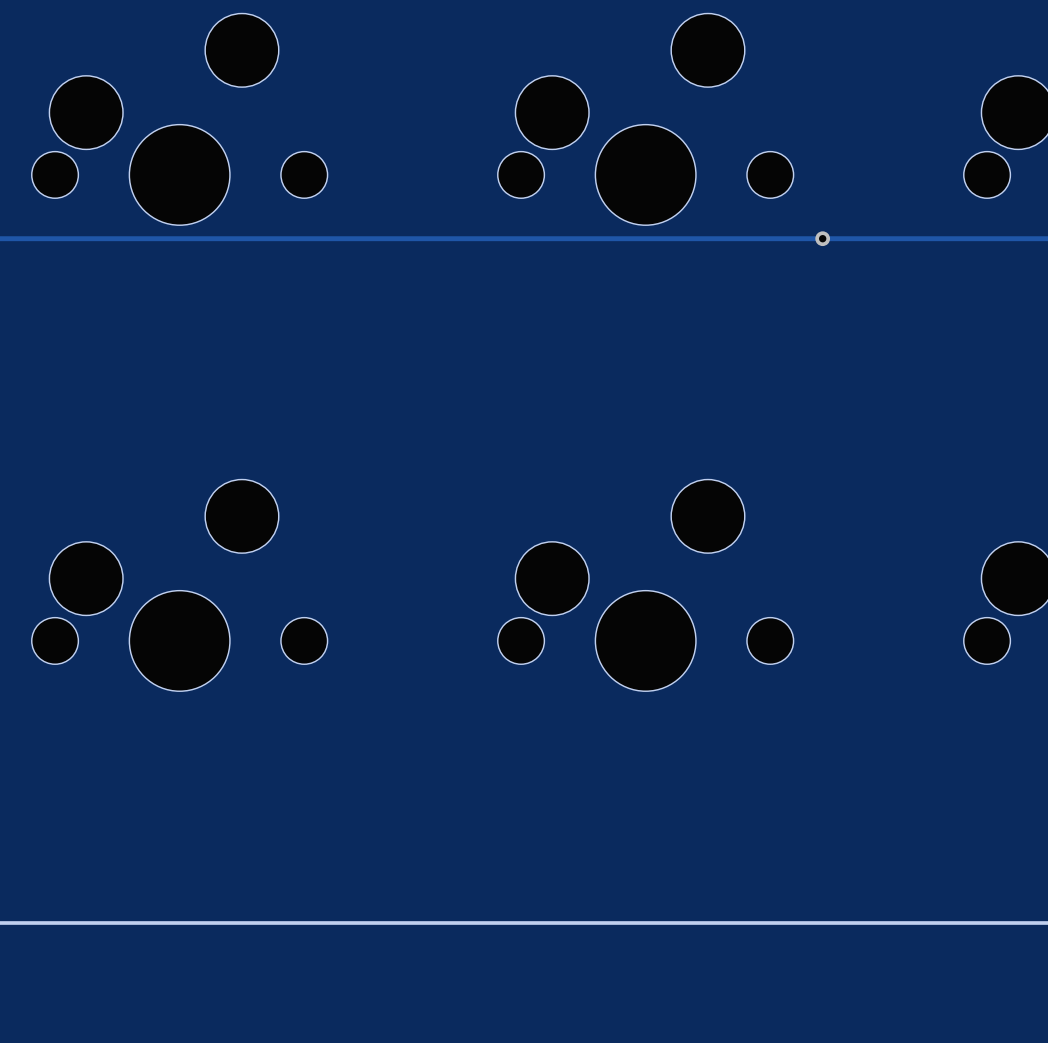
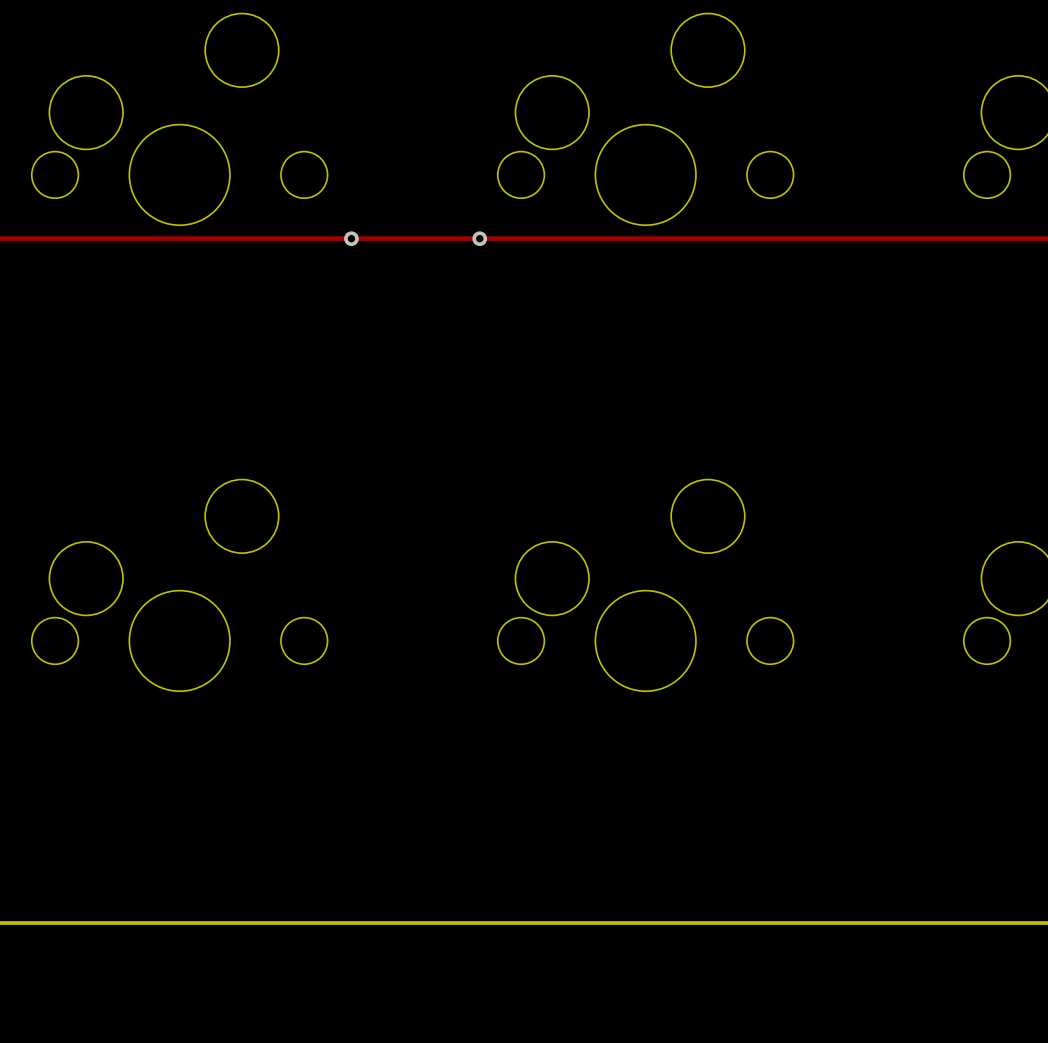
via: none -> (351, 238)
via: none -> (479, 238)
via: (822, 238) -> none

